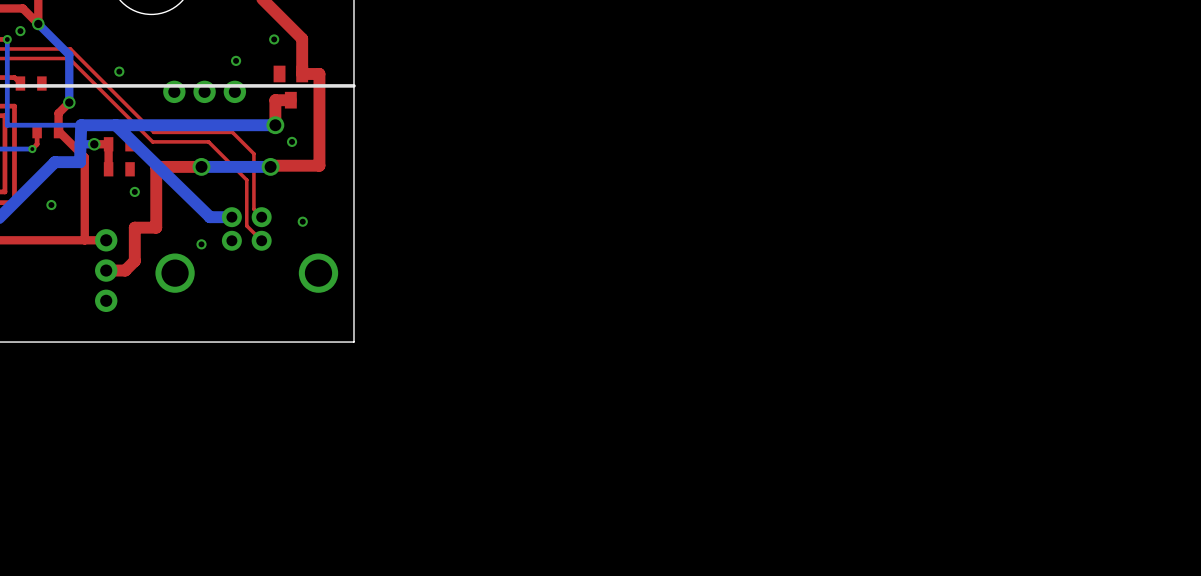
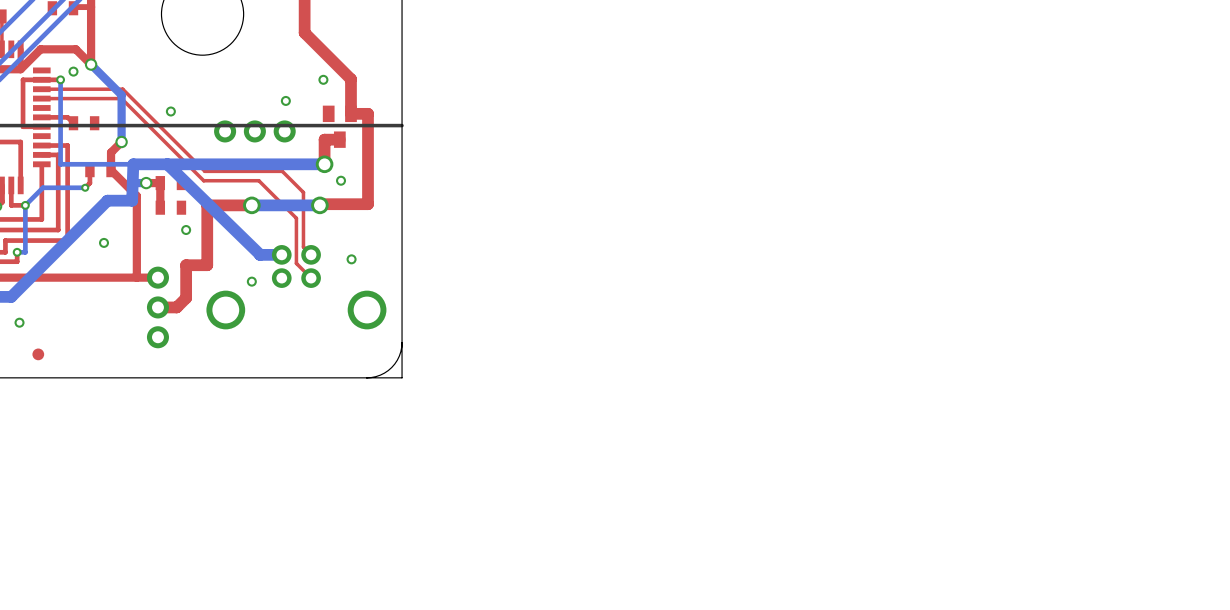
board edge: none -> (402, 342) (399, 356) (391, 367) (380, 375) (366, 377)

